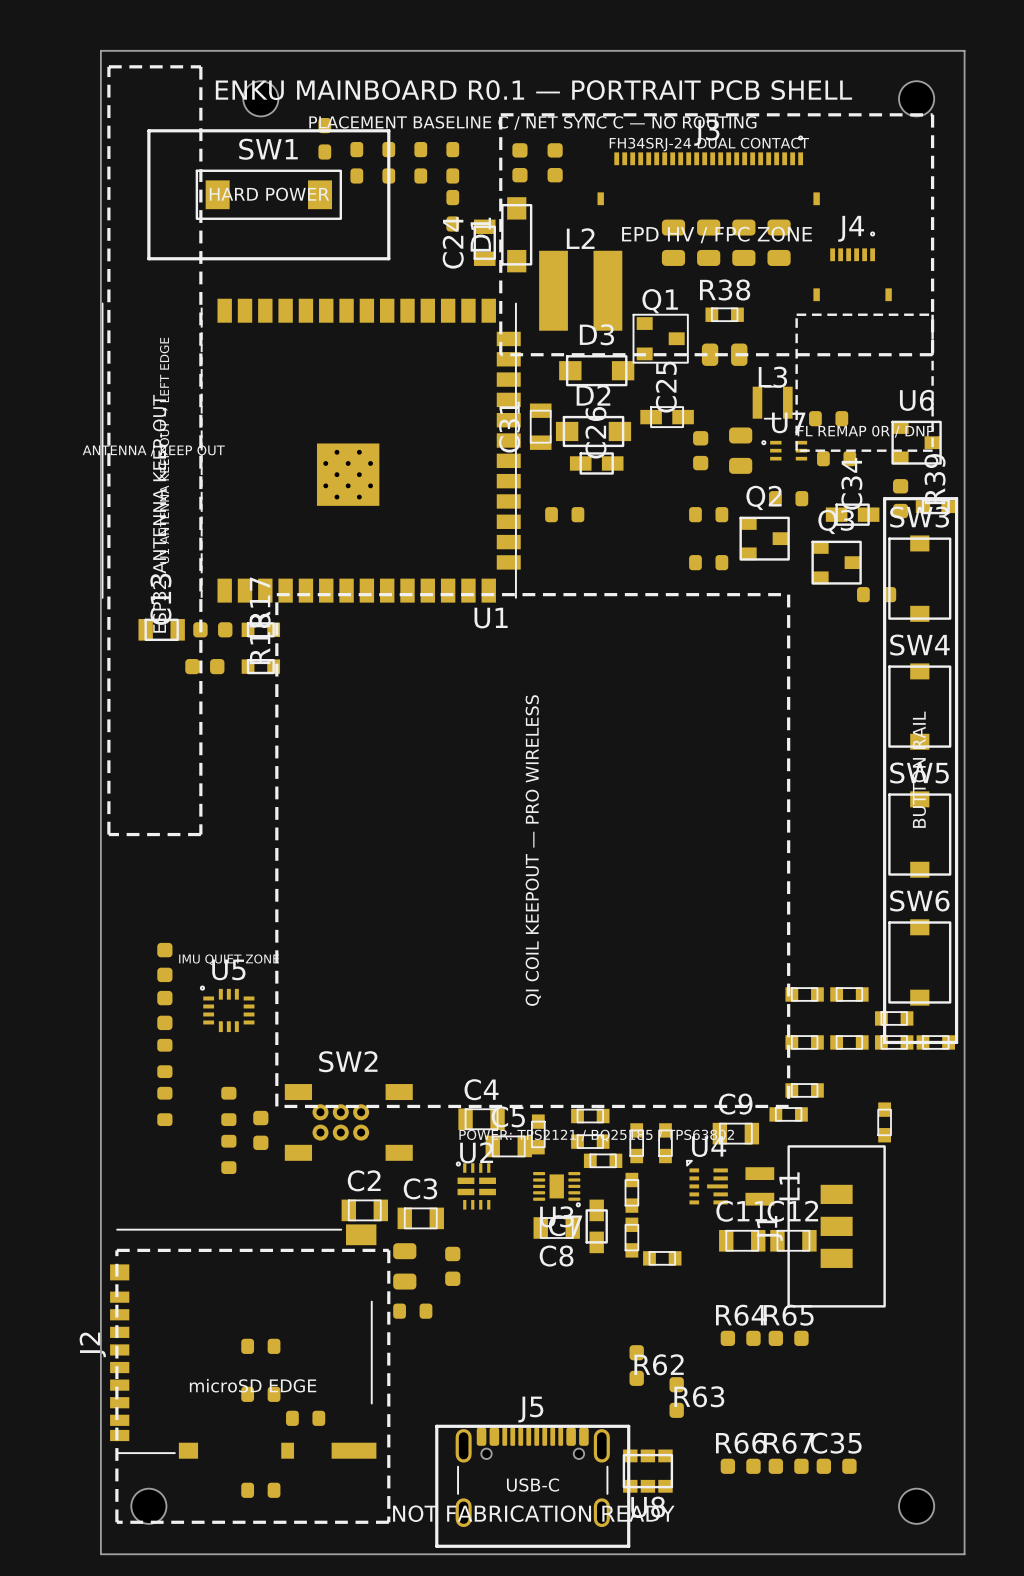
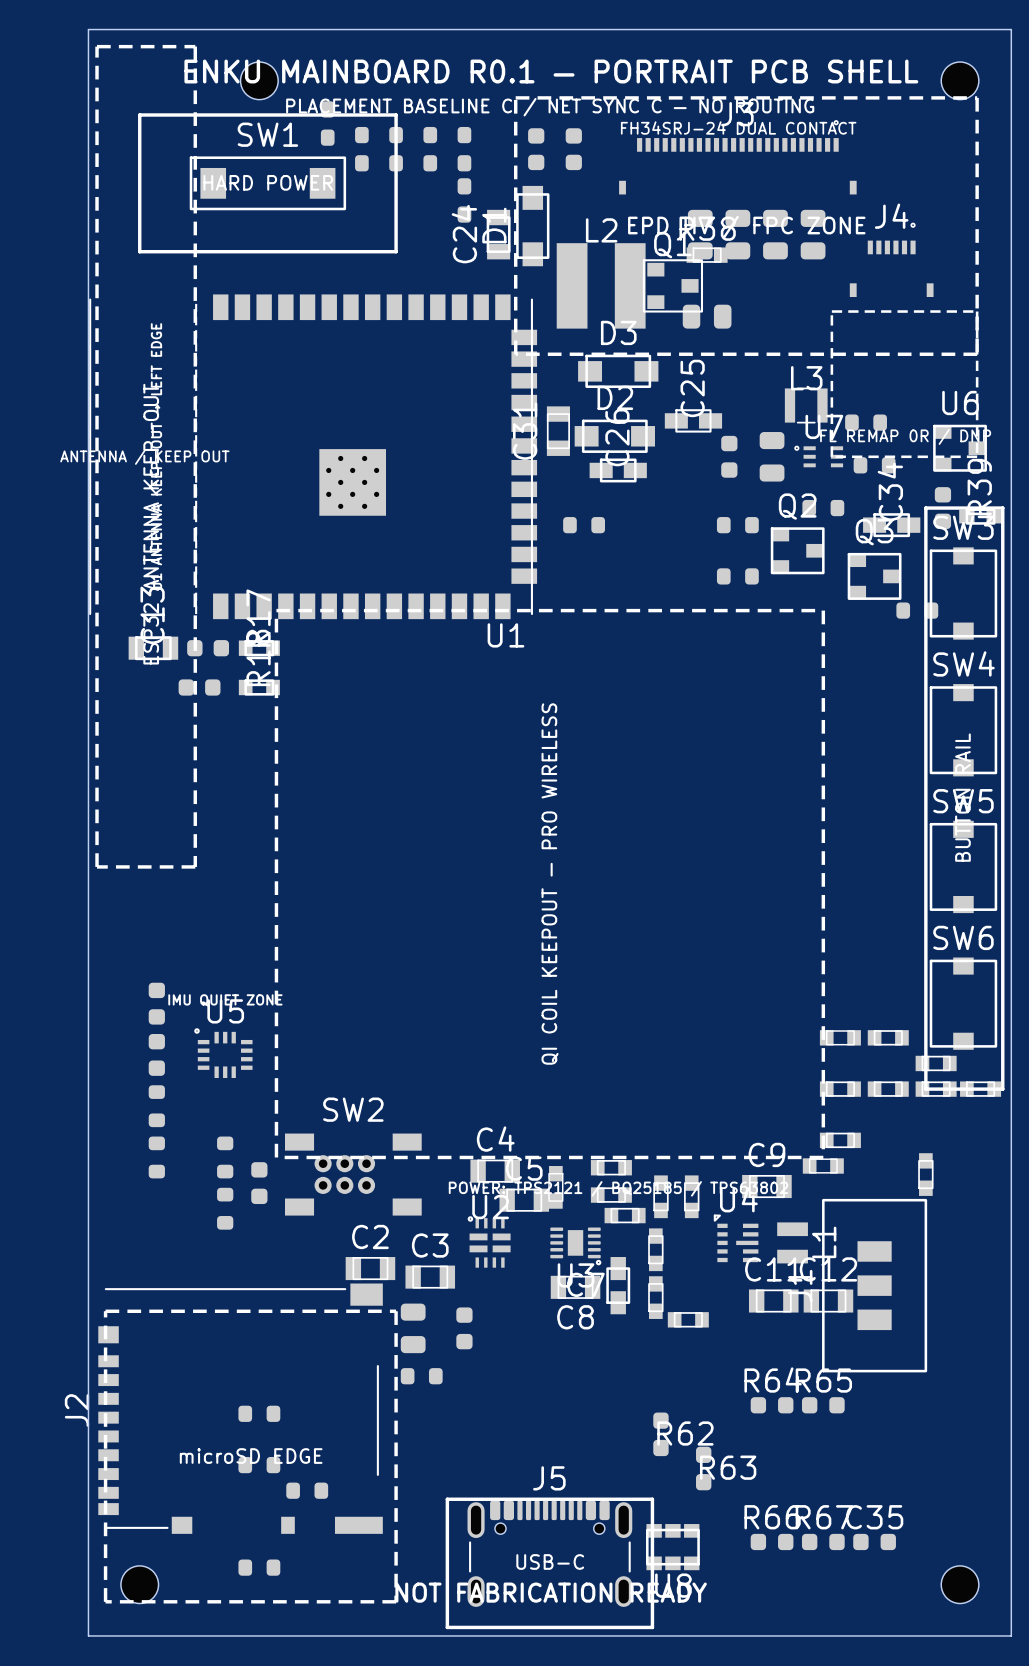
R38 position: (724, 314) -> (707, 255)
Q1 position: (660, 338) -> (672, 285)
part position: (724, 354) -> (707, 316)

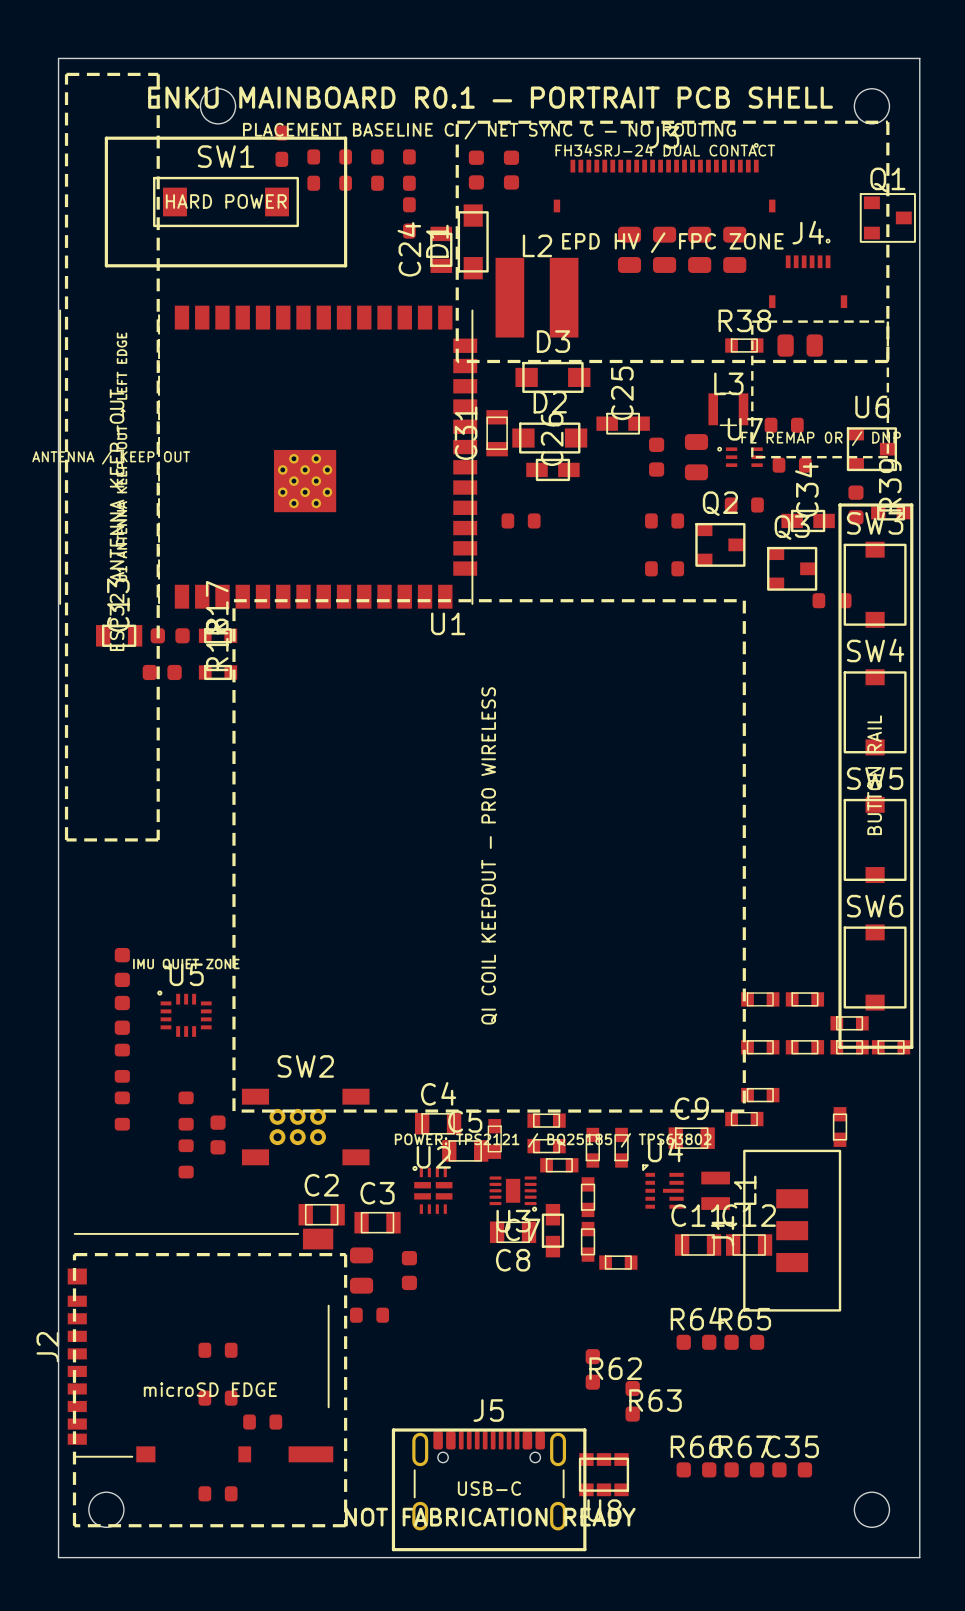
R38 position: (707, 255) -> (744, 345)
Q1 position: (672, 285) -> (887, 217)
part position: (707, 316) -> (800, 345)

